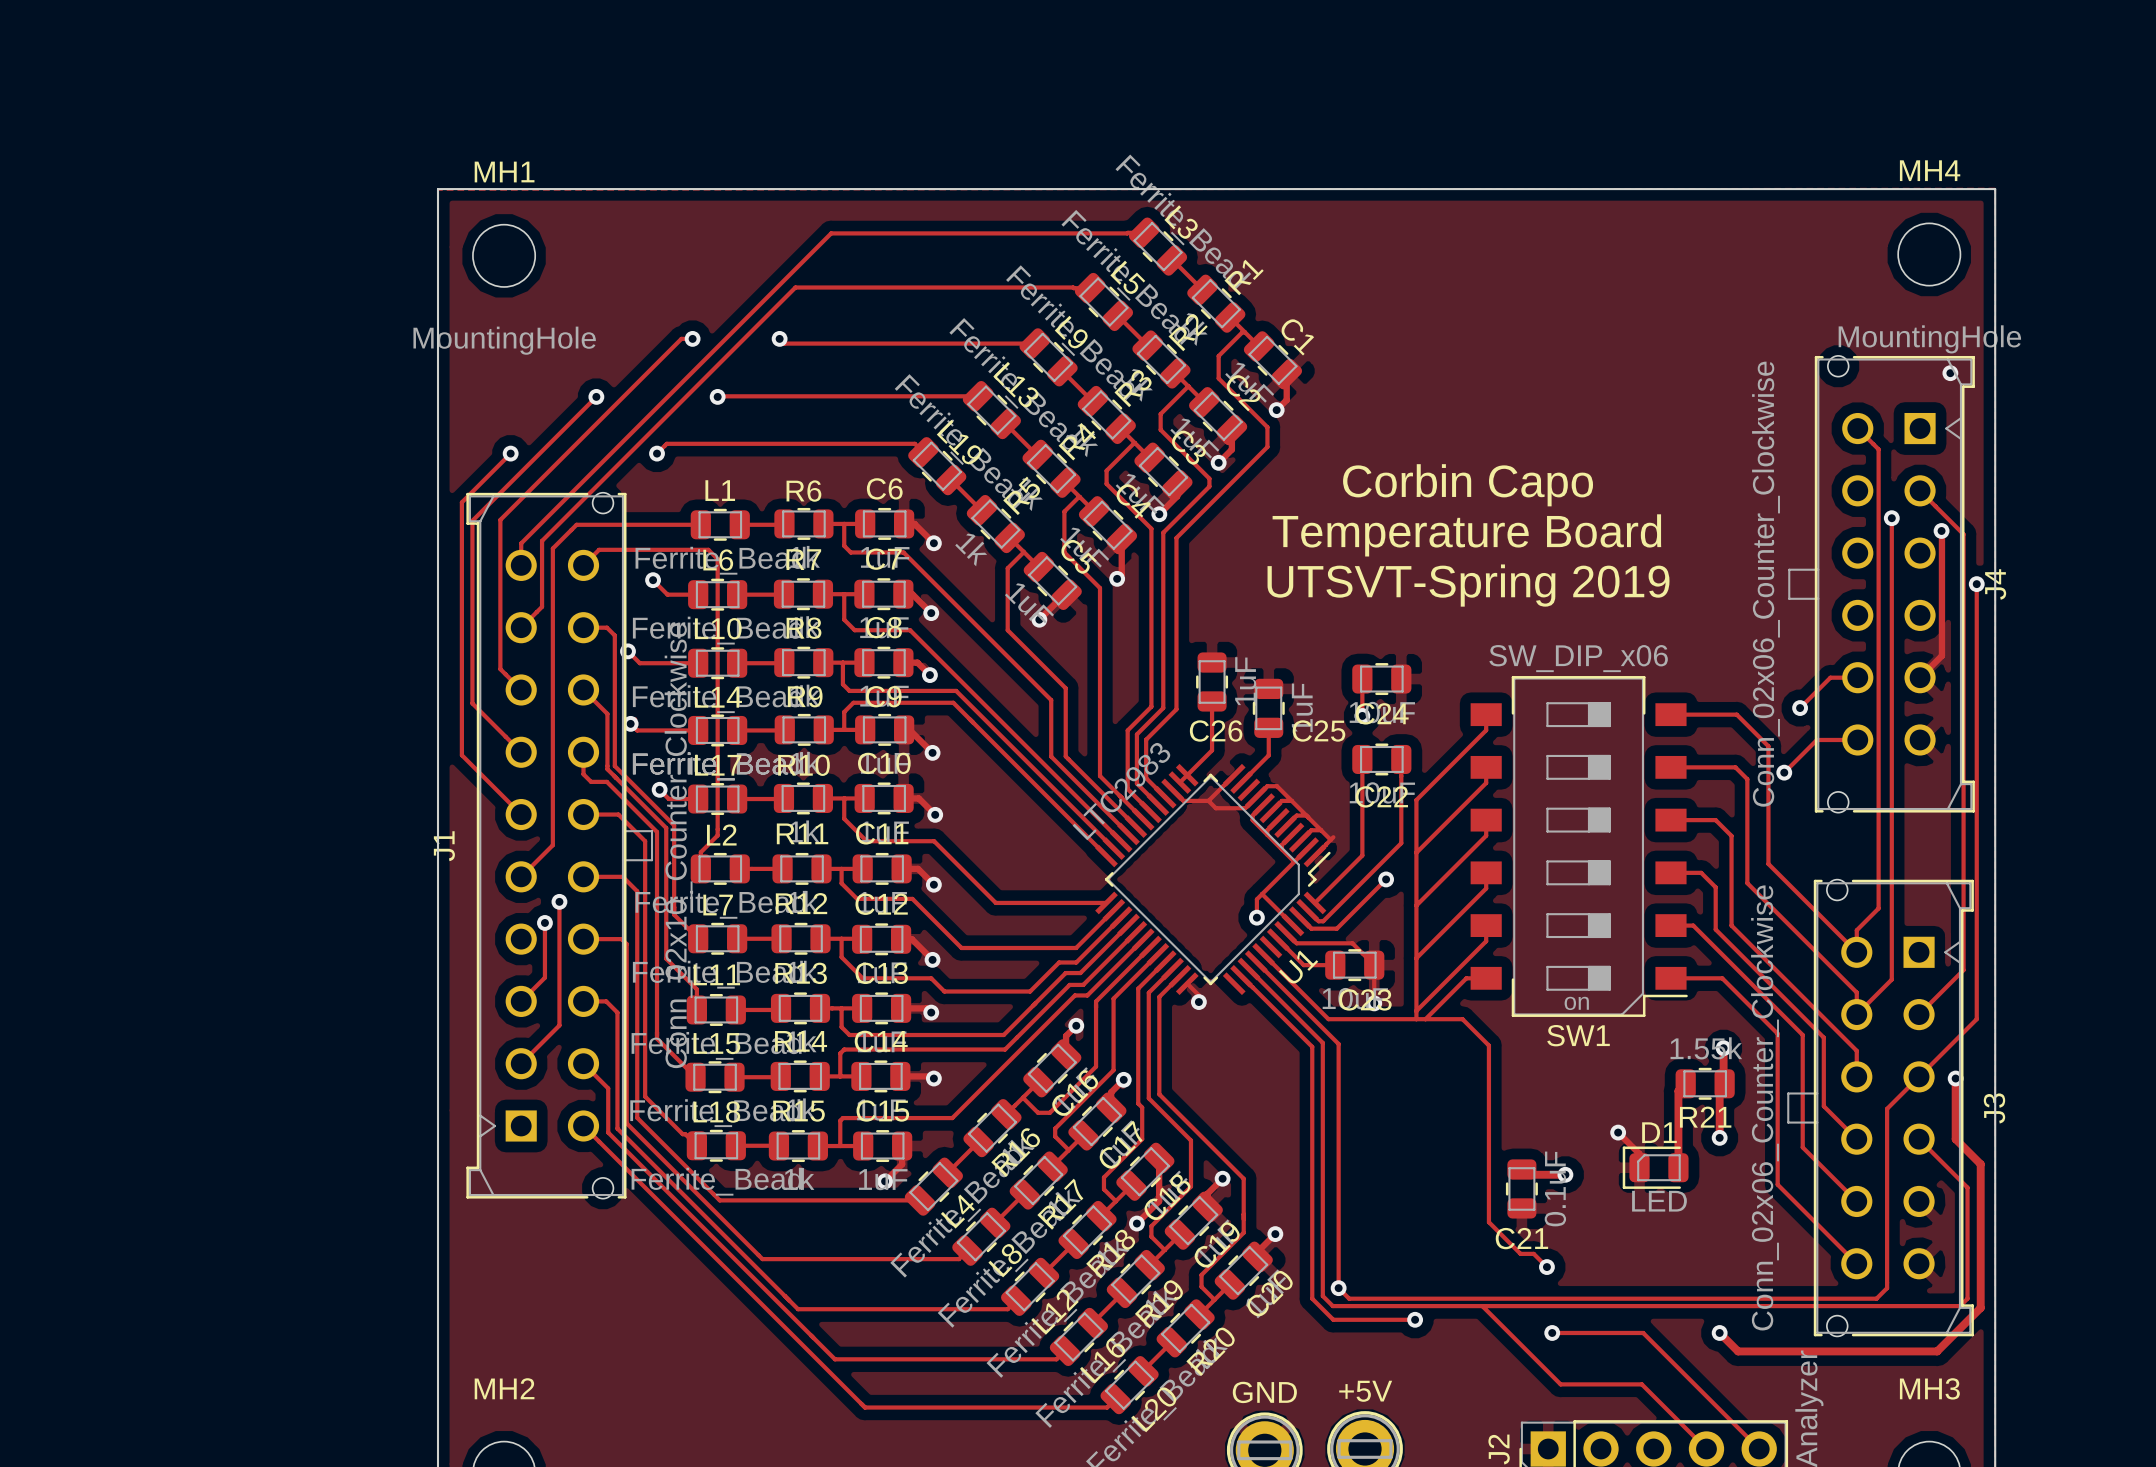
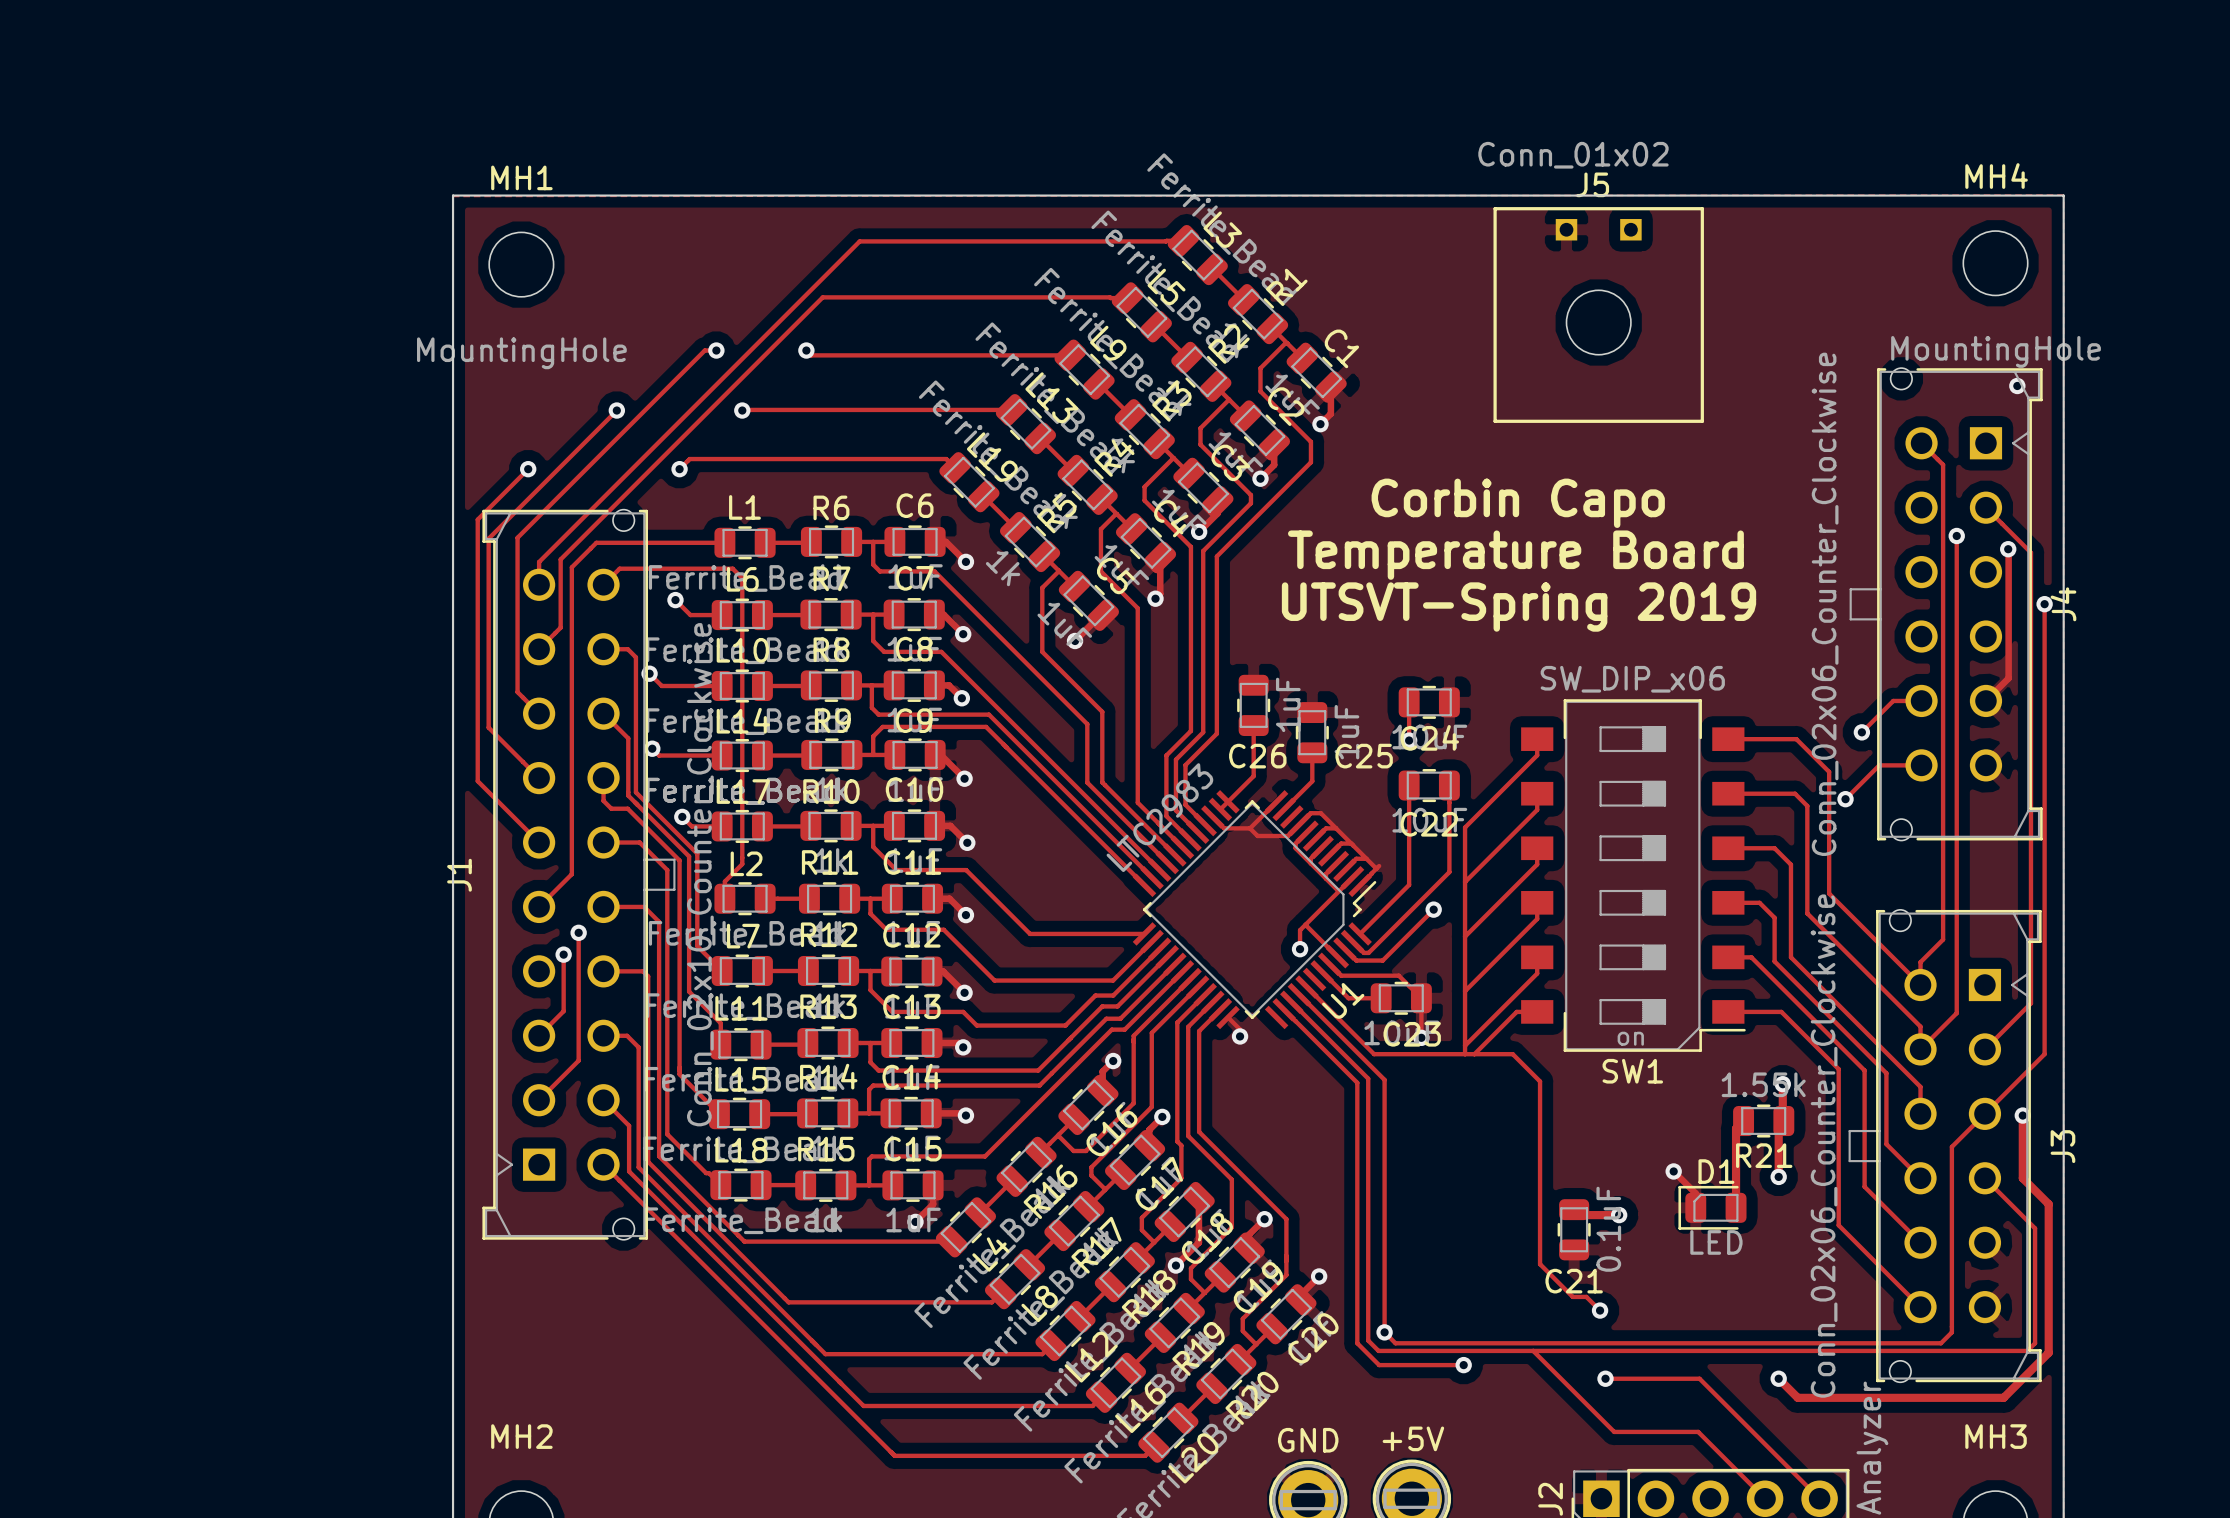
J5: none -> Conn_01x02 (1598, 315)

